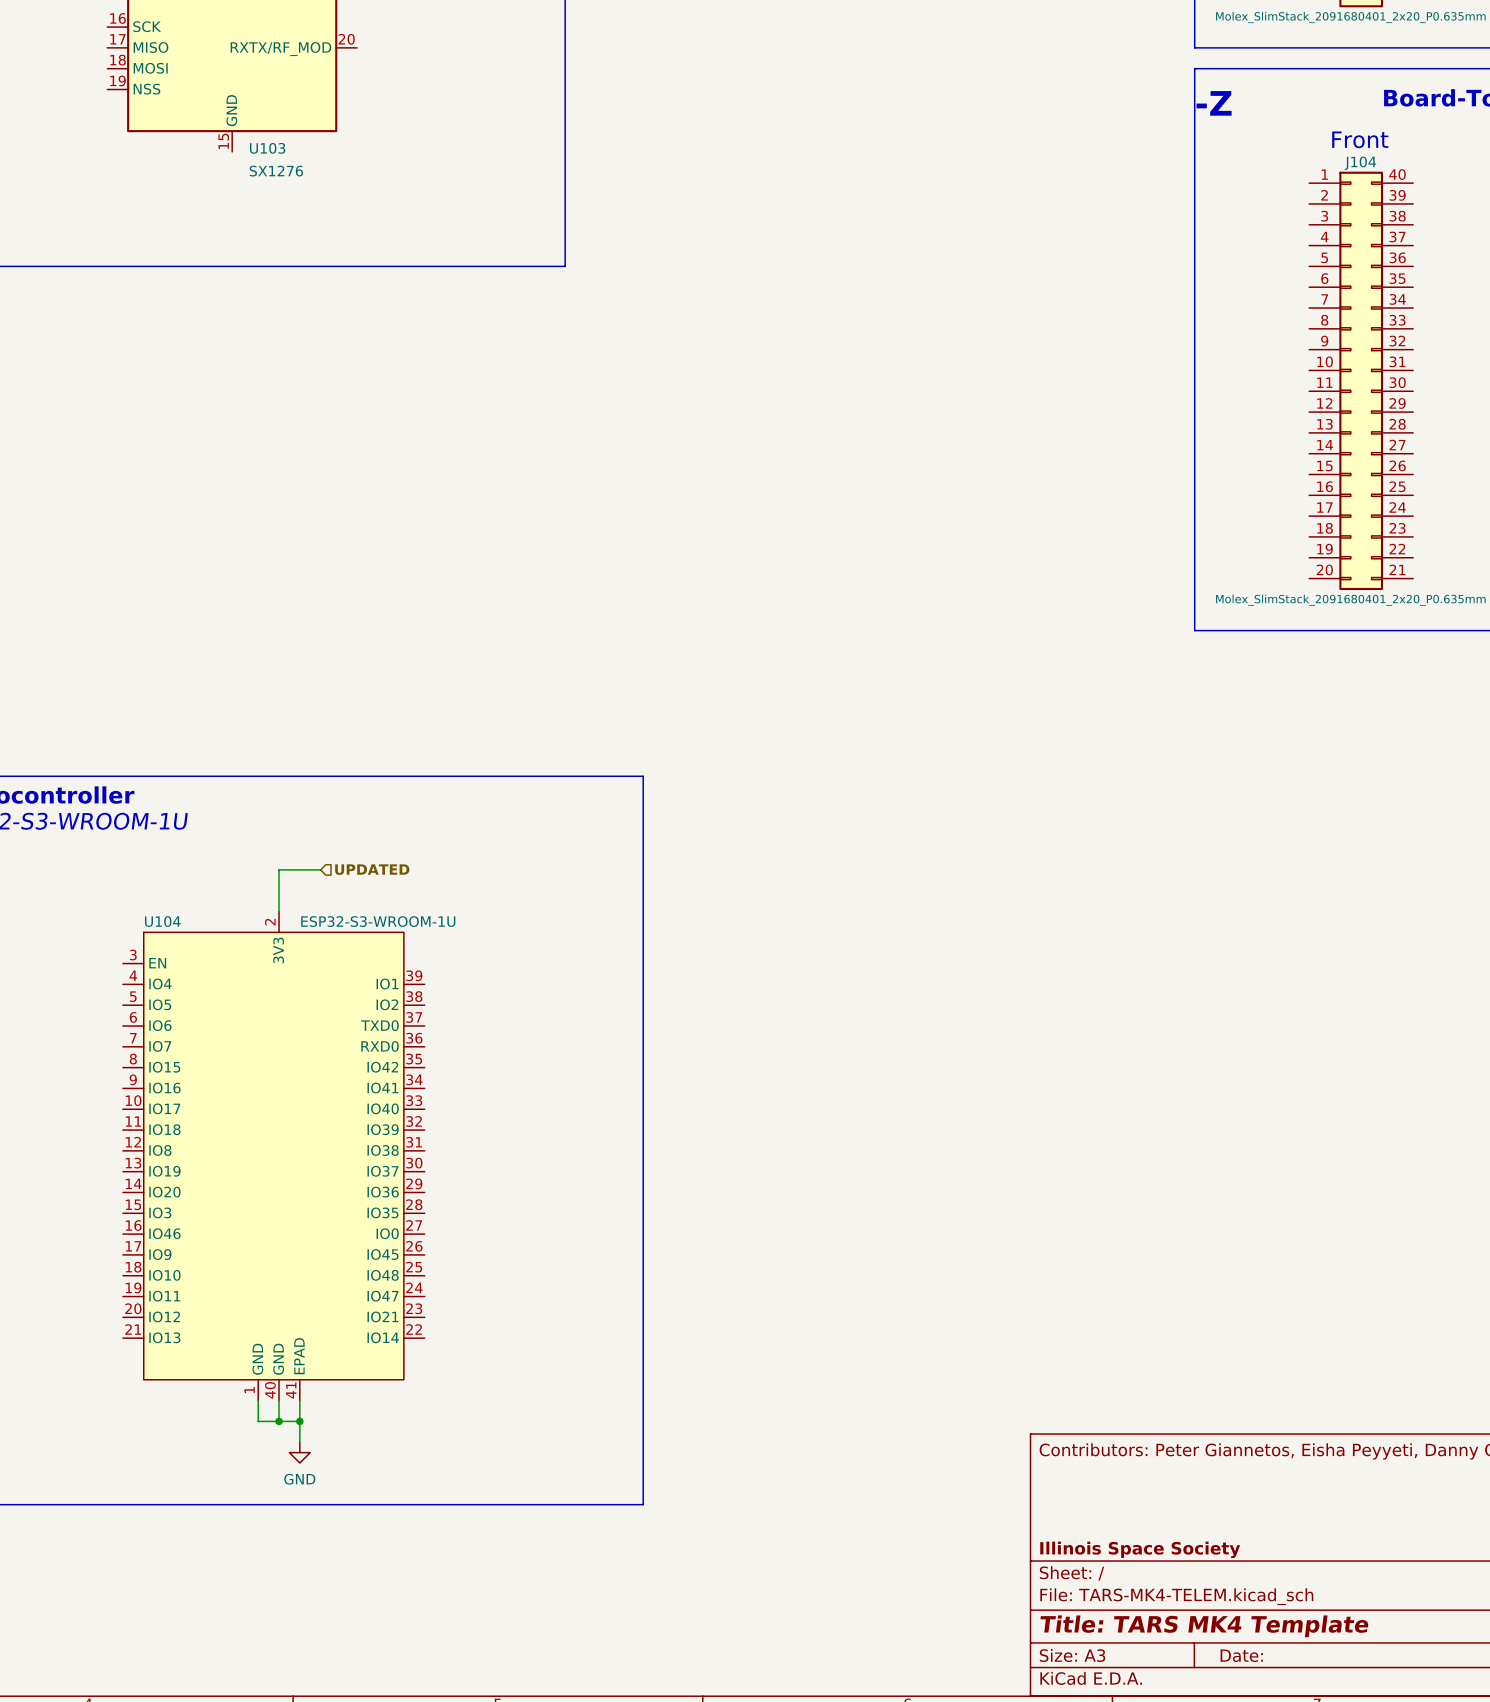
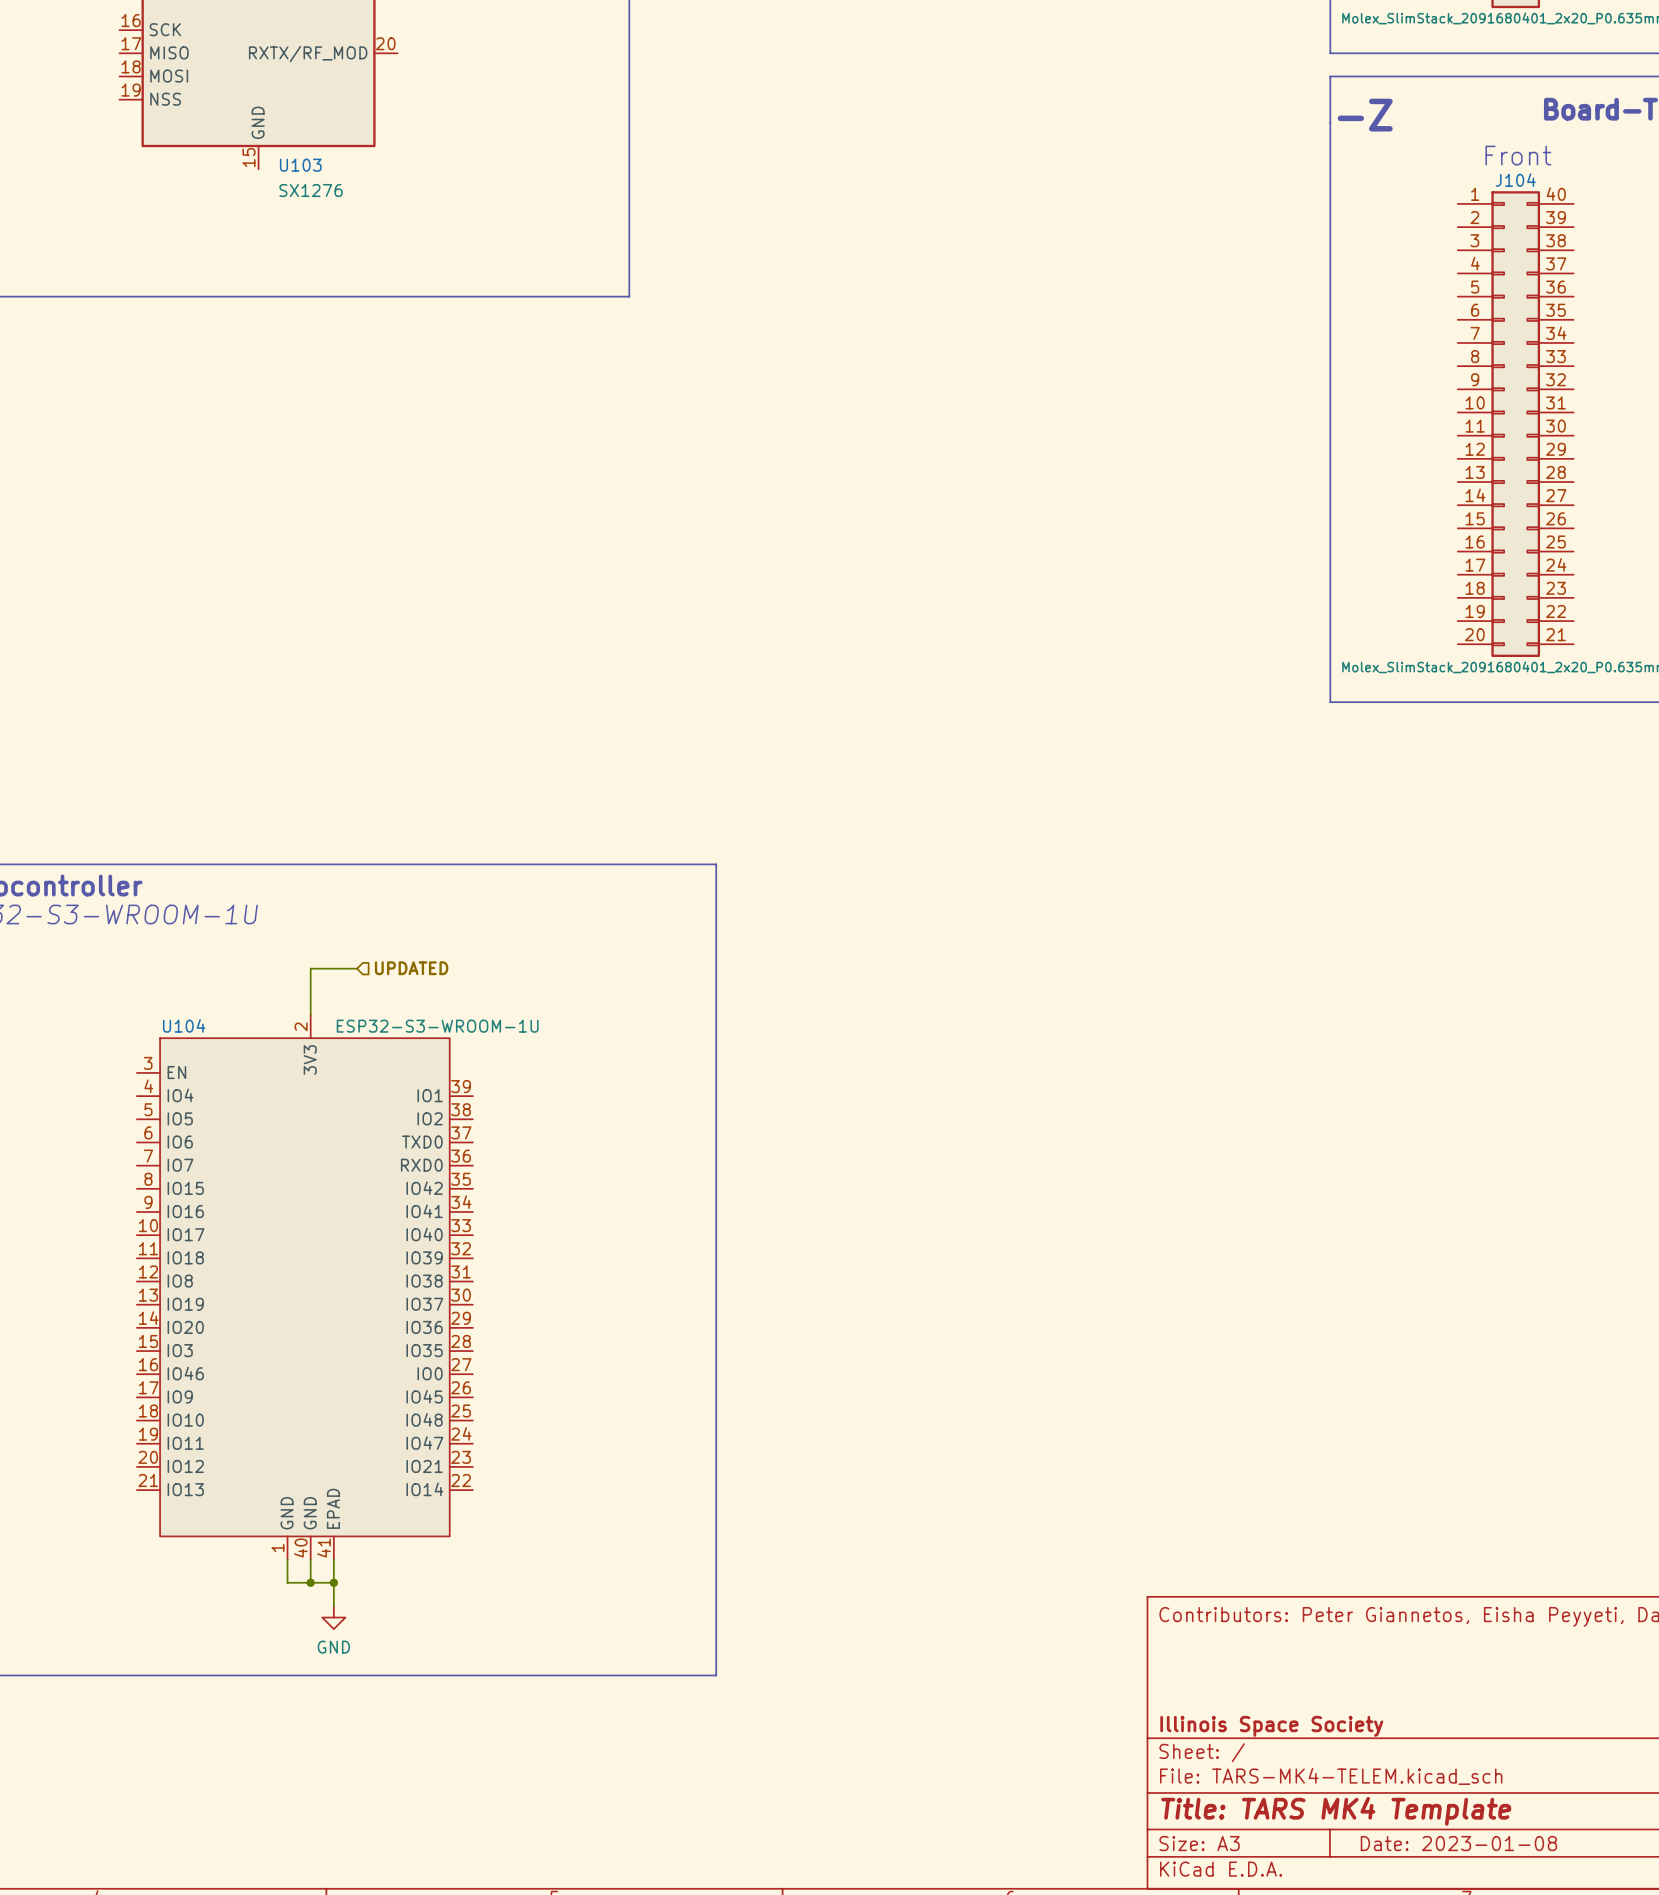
title block: Date: (1241, 1655) -> Date: 2023-01-08 (1458, 1843)

